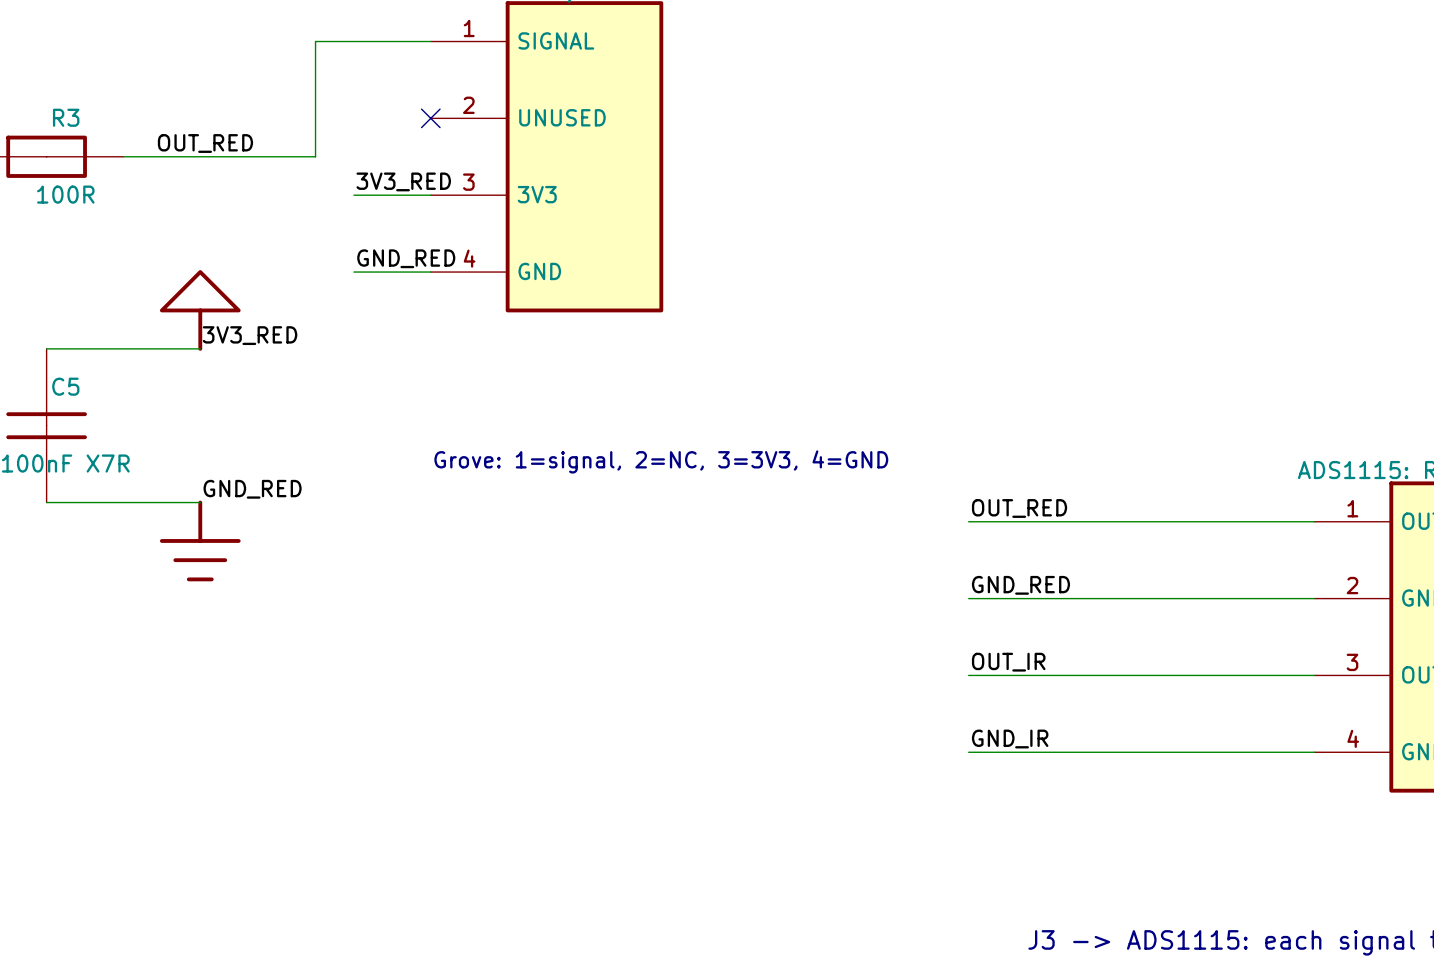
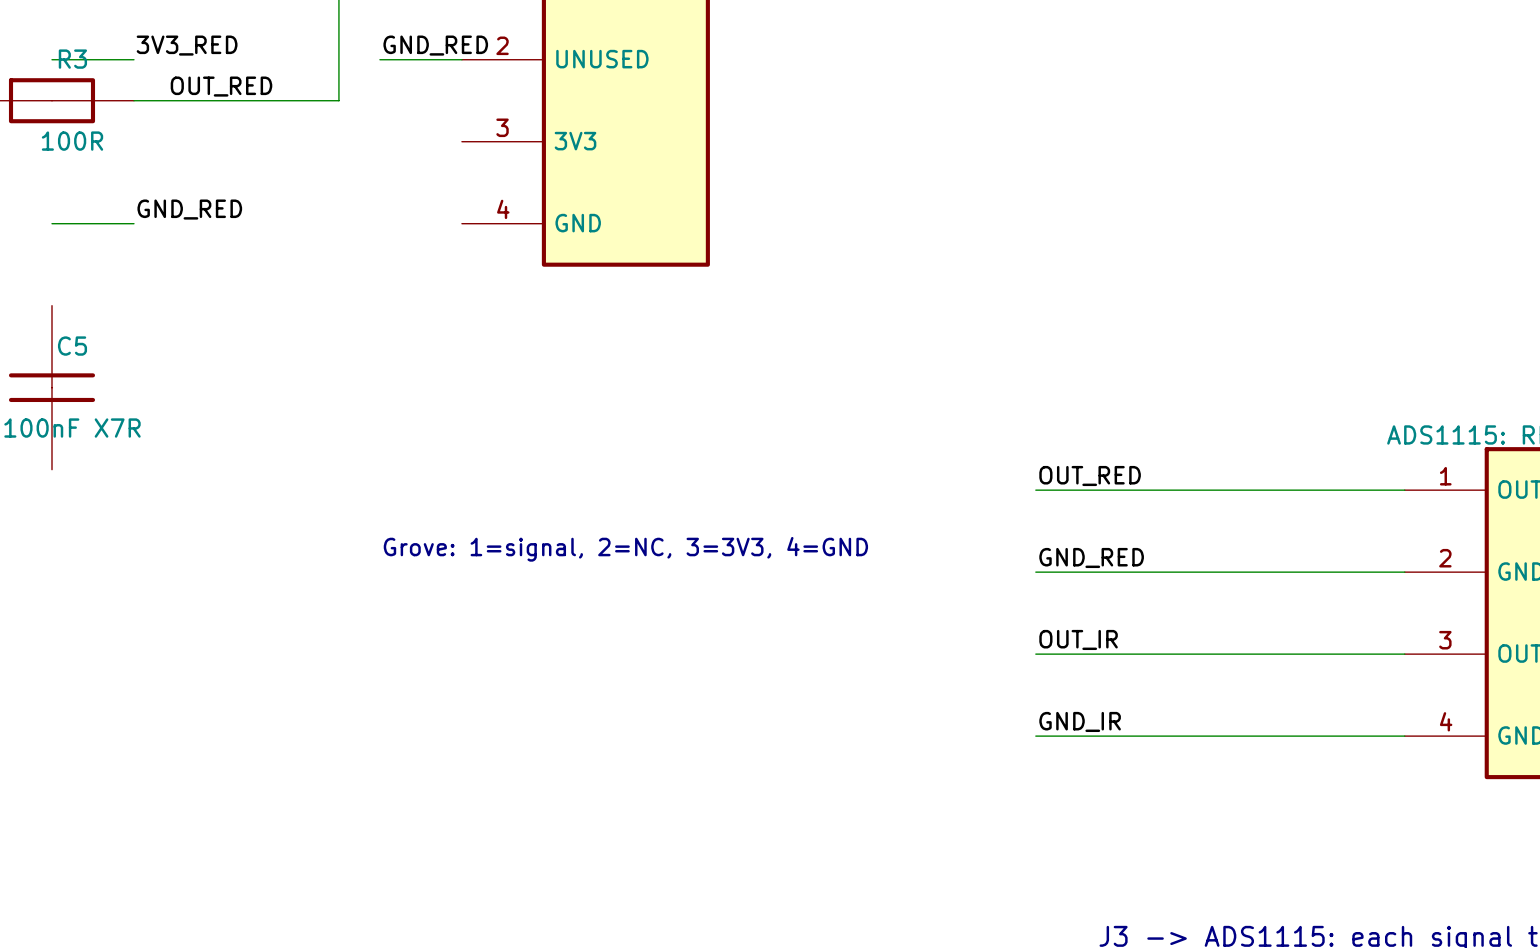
label: none -> 3V3_RED (187, 45)
label: none -> GND_RED (435, 45)
wire: none -> (52, 59) (133, 59)
no-connect mark: (430, 118) -> none
label: 3V3_RED (403, 181) -> none
wire: (353, 195) (430, 195) -> (379, 59) (461, 59)
label: none -> GND_RED (189, 209)
label: GND_RED (406, 258) -> none
wire: (353, 272) (430, 272) -> (52, 223) (133, 223)
power symbol: (200, 310) -> none
label: 3V3_RED (250, 335) -> none
wire: (46, 348) (200, 348) -> none
text position: Grove: 1=signal, 2=NC, 3=3V3, 4=GND (661, 461) -> Grove: 1=signal, 2=NC, 3=3V3, 4=GND (625, 549)
label: GND_RED (252, 489) -> none
wire: (46, 502) (200, 502) -> none
power symbol: (200, 540) -> none

